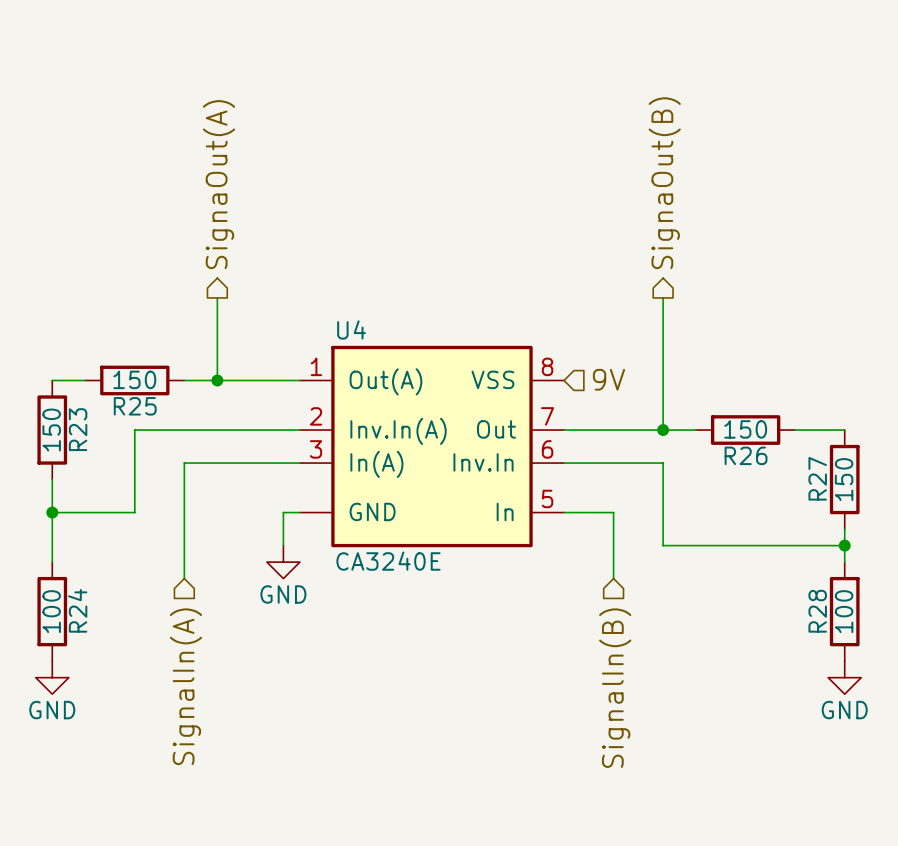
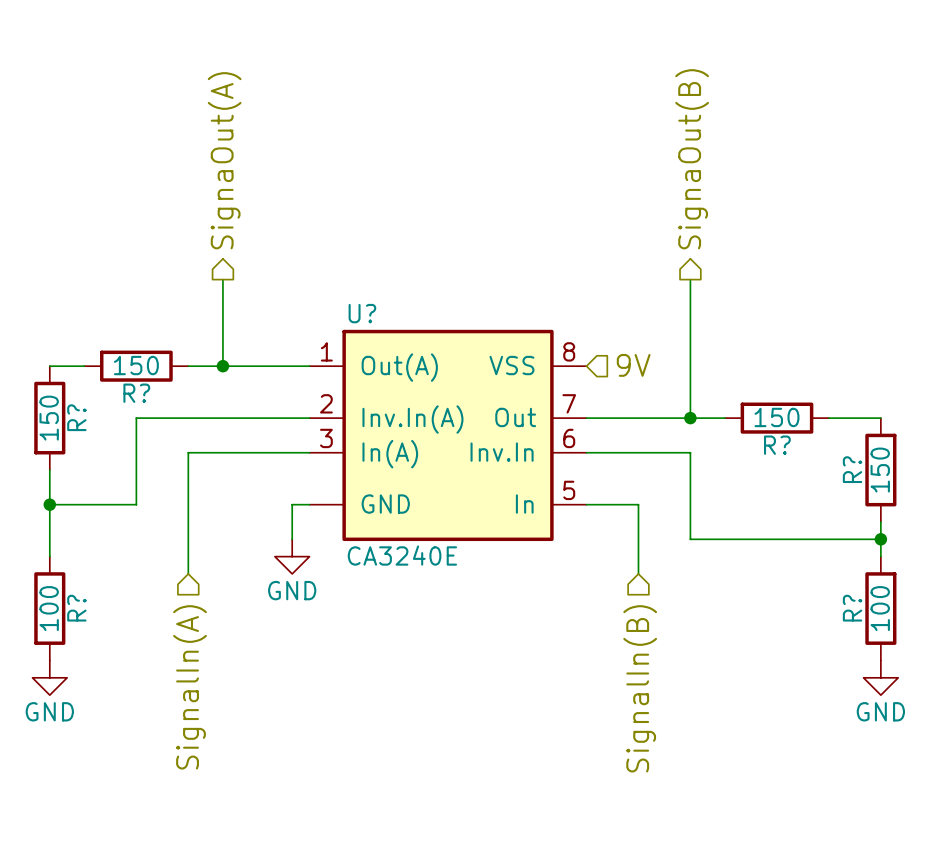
U4 name: U4 (351, 329) -> U? (362, 313)
R25 name: R25 (135, 406) -> R? (136, 393)
R23 name: R23 (78, 429) -> R? (76, 417)
R26 name: R26 (746, 455) -> R? (777, 445)
R27 name: R27 (817, 478) -> R? (852, 469)
R24 name: R24 (77, 610) -> R? (76, 608)
R28 name: R28 (817, 611) -> R? (852, 608)

